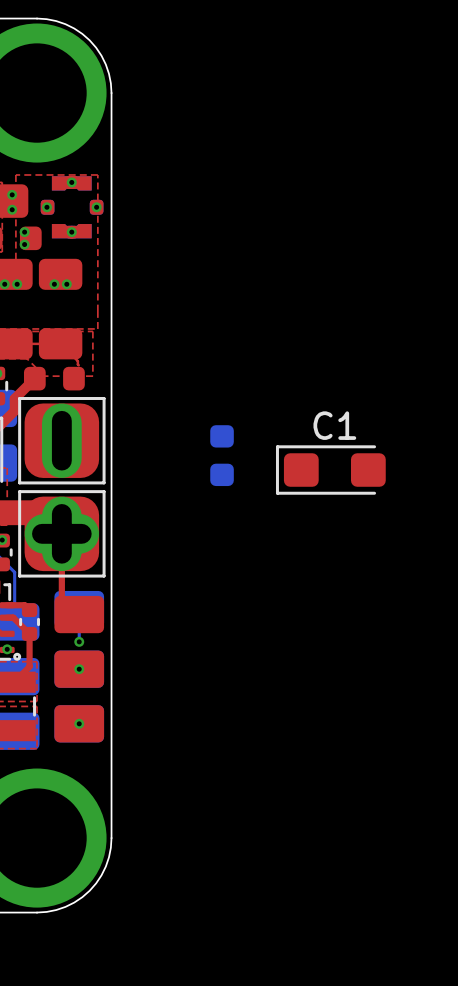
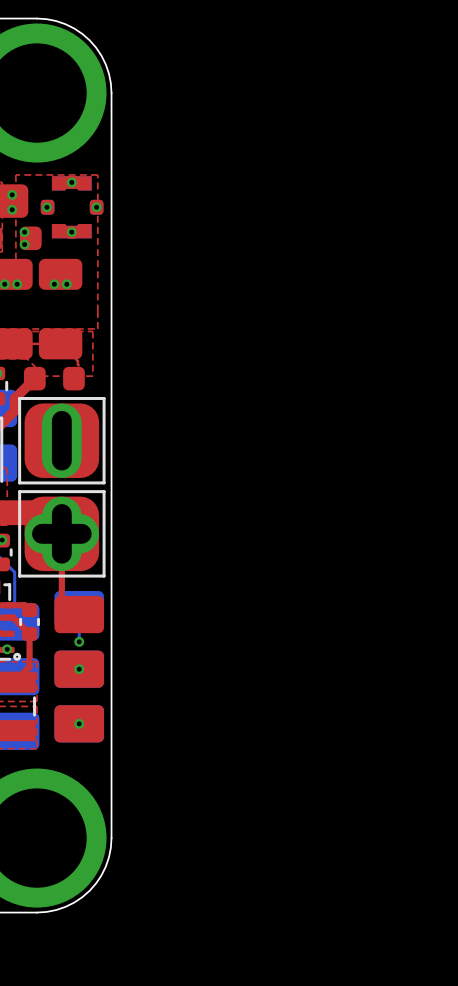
part: (222, 455) -> none
C1: (330, 470) -> none

